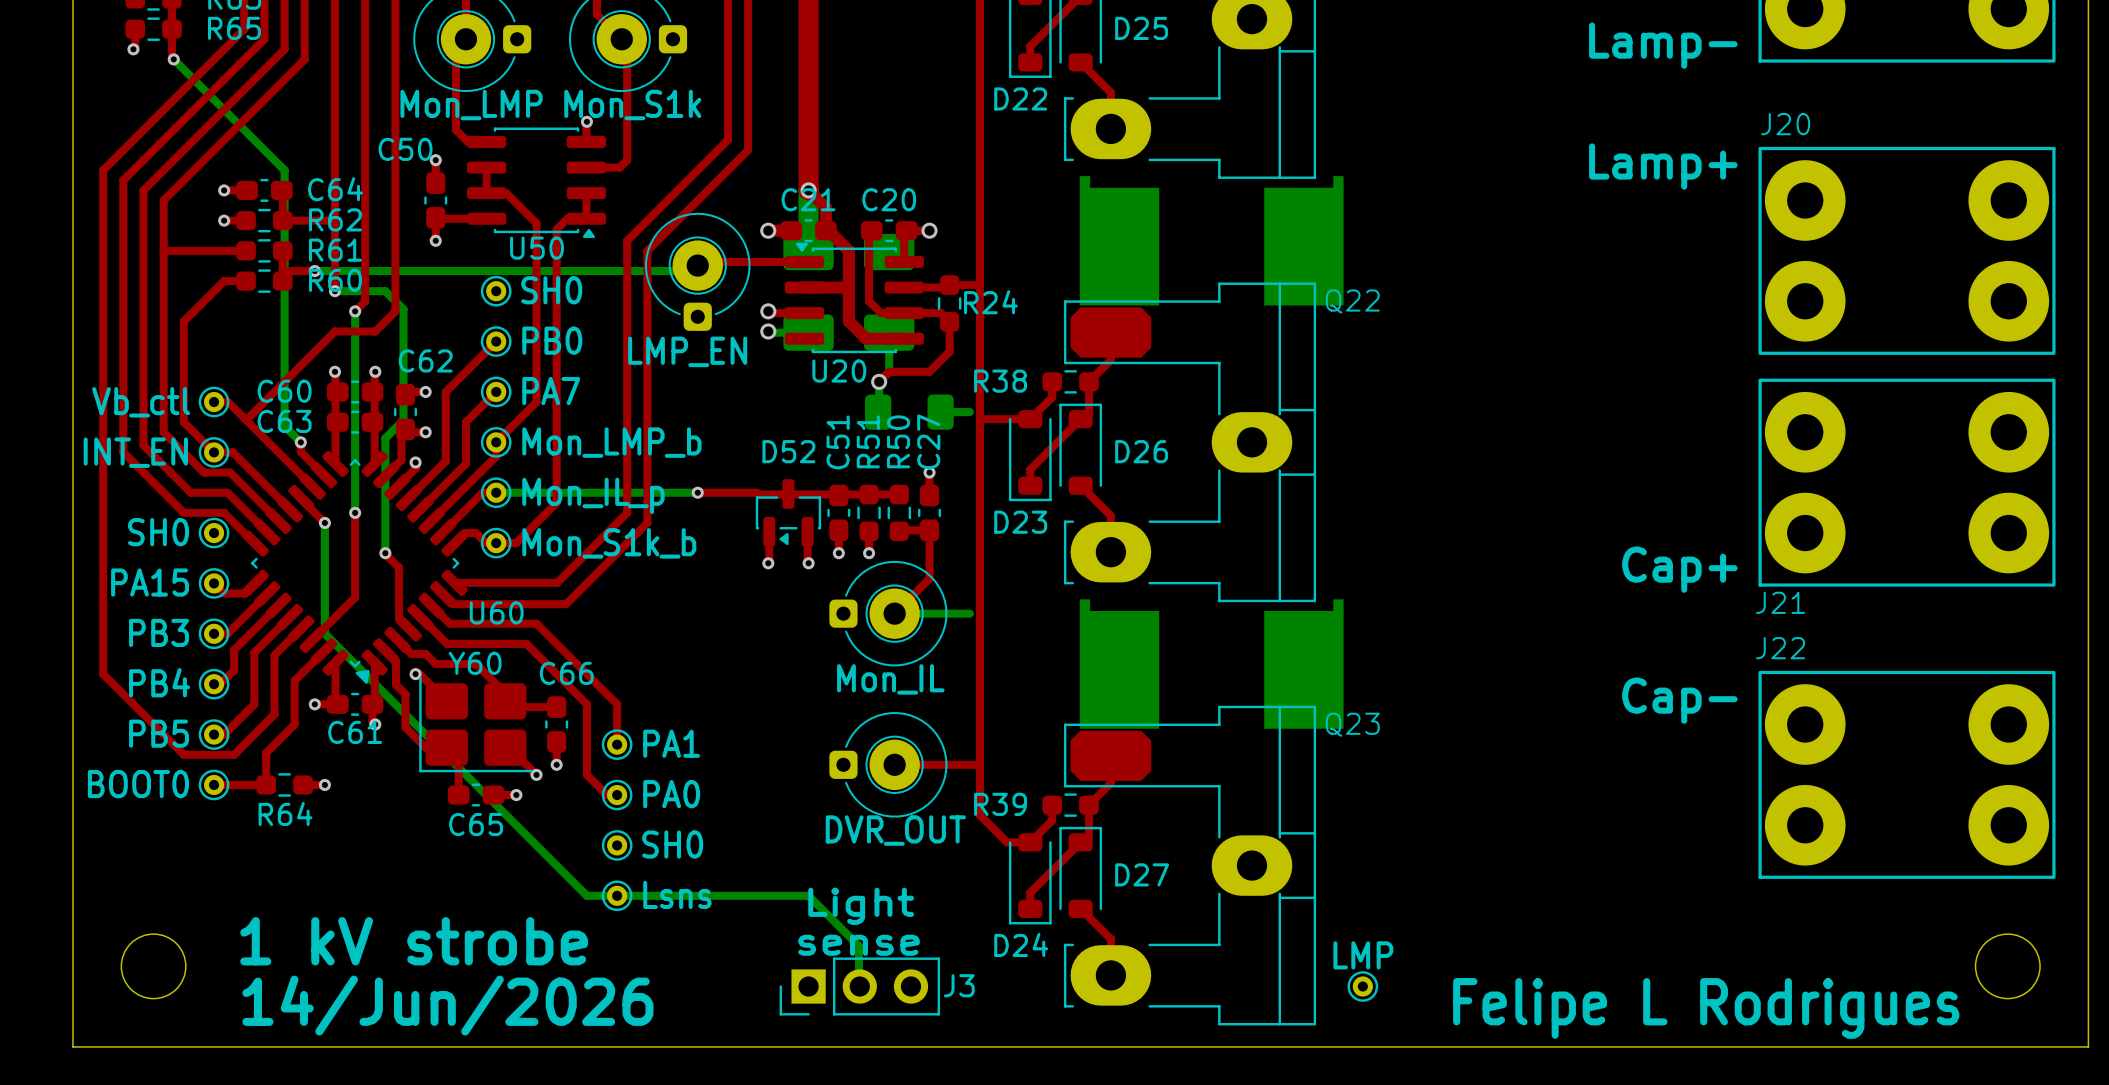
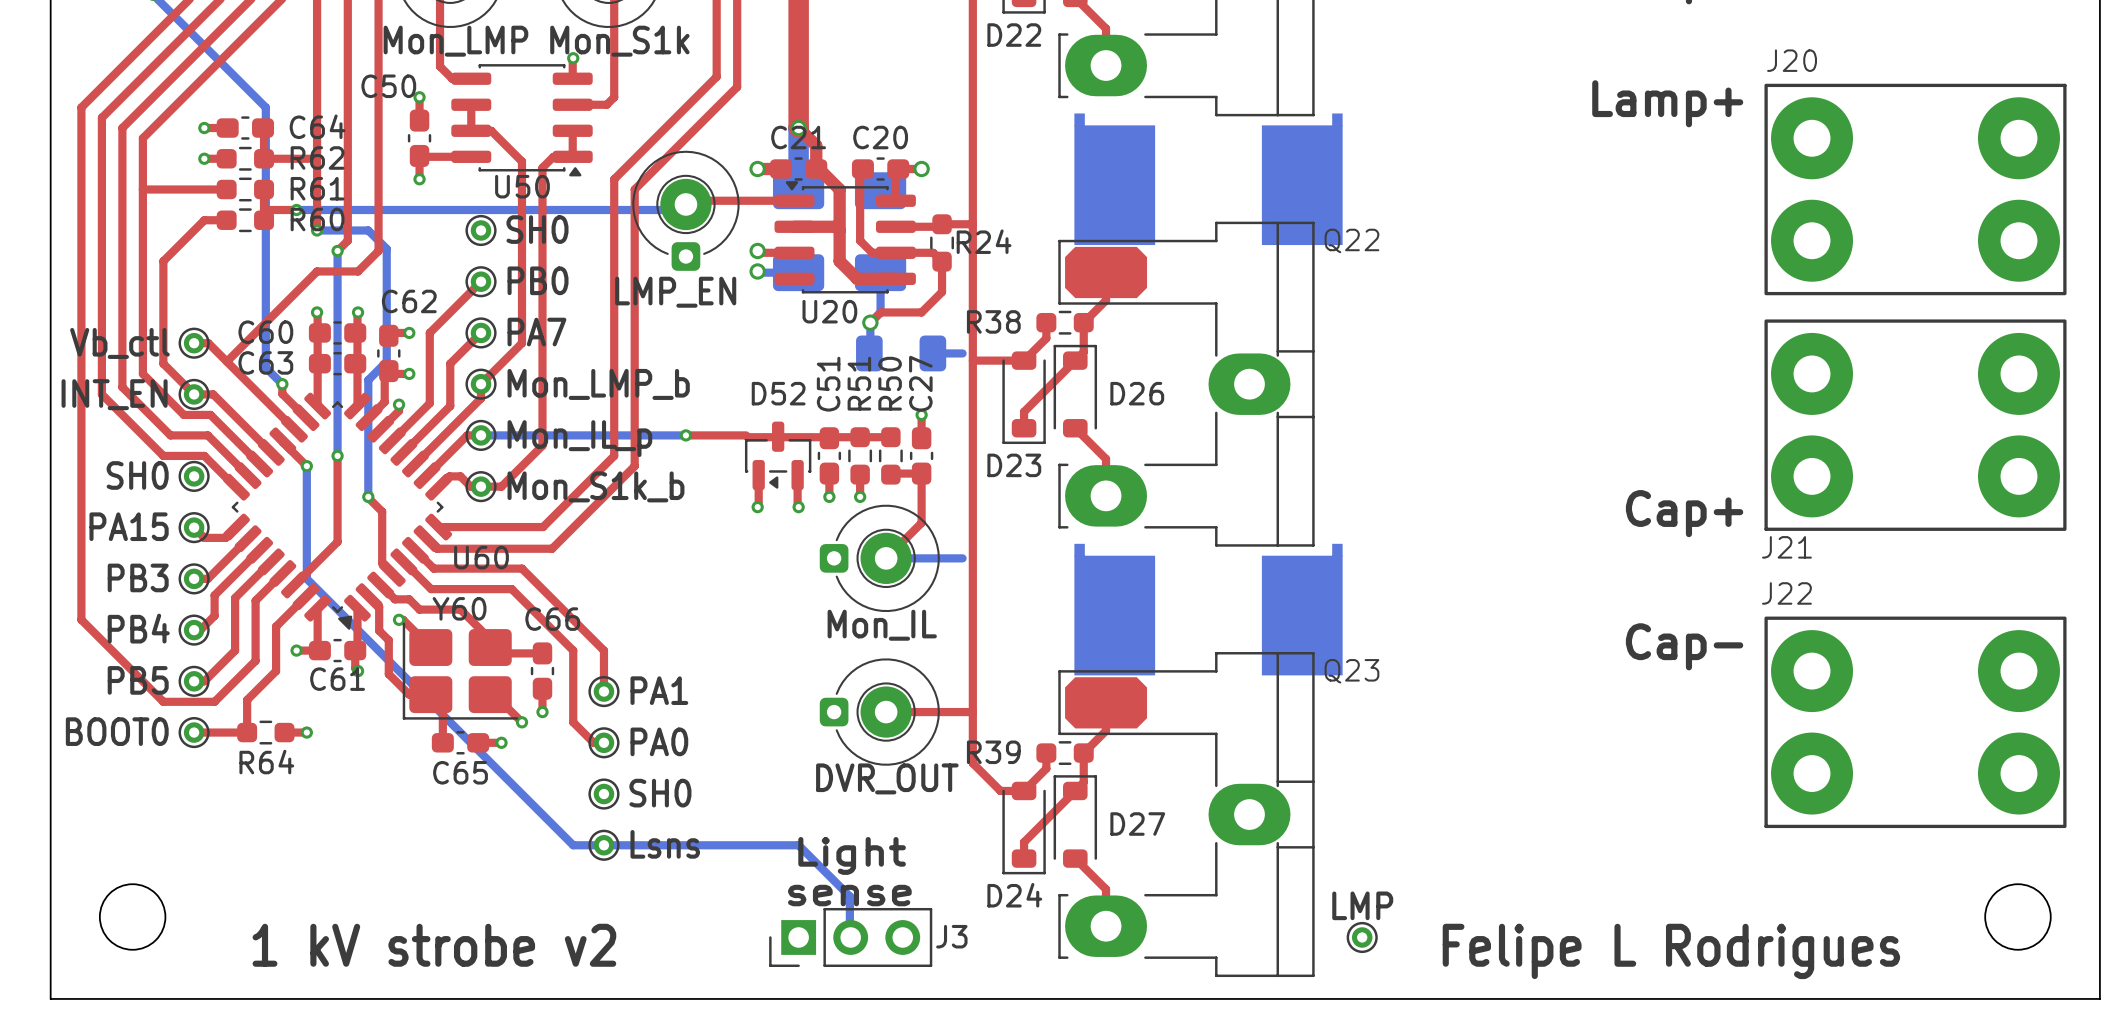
text: 1 kV strobe (414, 941) -> 1 kV strobe v2 (434, 945)
text: none -> Felipe L Rodrigues (1671, 951)
text: 14/Jun/2026 (447, 1005) -> none
text: Felipe L Rodrigues (1706, 1008) -> none

